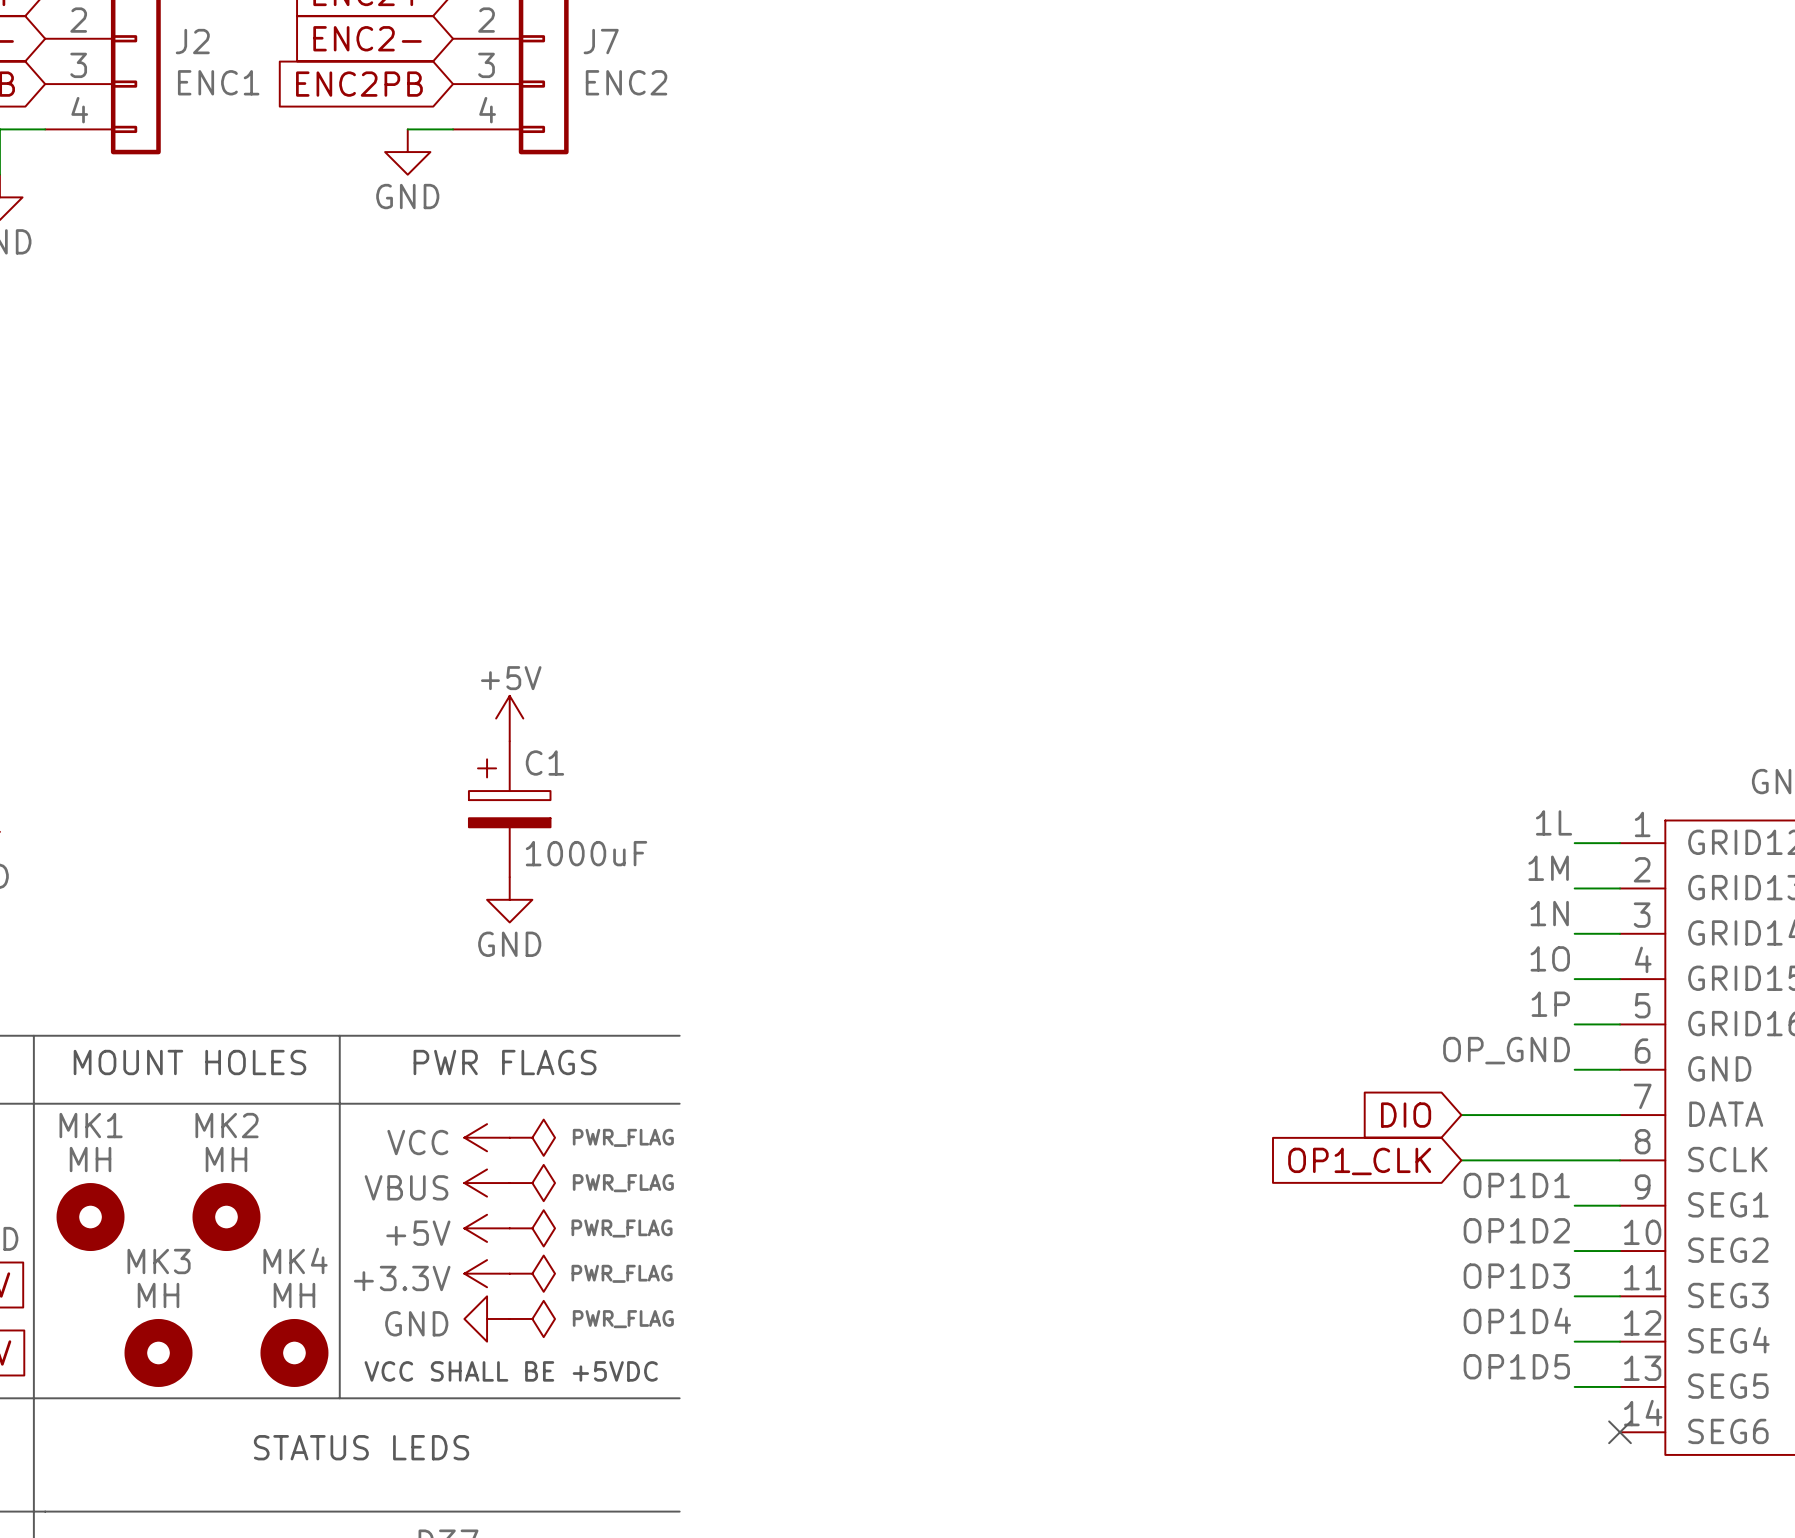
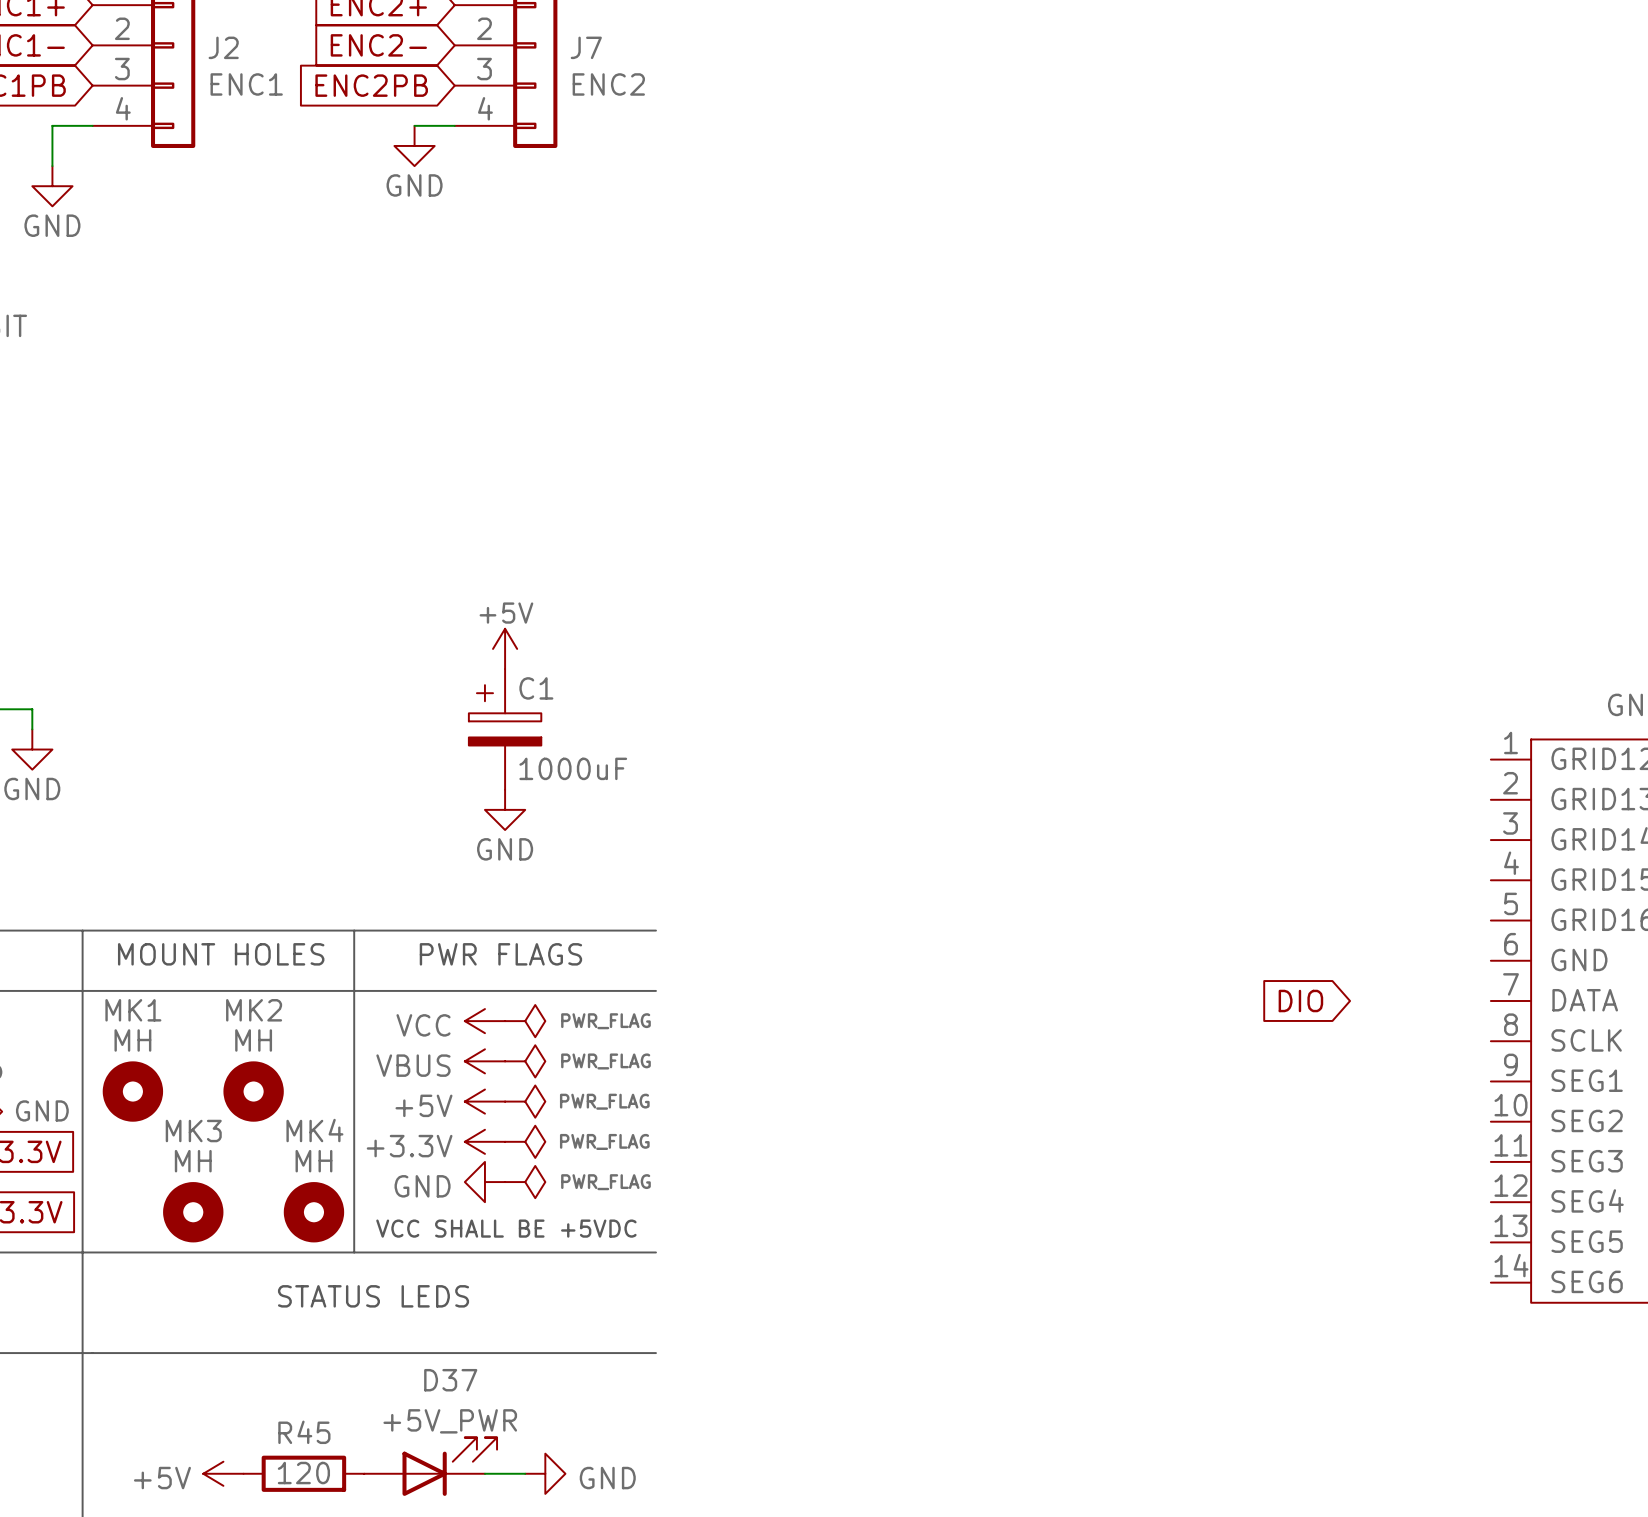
label: 1L (1554, 822) -> none
wire: (1574, 843) (1620, 843) -> none
label: 1M (1548, 868) -> none
wire: (1574, 888) (1620, 888) -> none
label: 1N (1549, 913) -> none
wire: (1574, 933) (1620, 933) -> none
label: 1O (1550, 958) -> none
wire: (1574, 979) (1620, 979) -> none
label: 1P (1550, 1004) -> none
wire: (1574, 1024) (1620, 1024) -> none
label: OP_GND (1506, 1050) -> none
wire: (1574, 1069) (1620, 1069) -> none
wire: (1461, 1115) (1620, 1115) -> none
wire: (1461, 1160) (1620, 1160) -> none
global label: OP1_CLK (1359, 1161) -> none
label: OP1D1 (1516, 1185) -> none
wire: (1574, 1205) (1620, 1205) -> none
label: OP1D2 (1516, 1230) -> none
wire: (1574, 1251) (1620, 1251) -> none
label: OP1D3 (1516, 1276) -> none
wire: (1574, 1296) (1620, 1296) -> none
label: OP1D4 (1517, 1320) -> none
wire: (1574, 1341) (1620, 1341) -> none
label: OP1D5 (1516, 1366) -> none
wire: (1574, 1386) (1620, 1386) -> none
no-connect mark: (1620, 1432) -> none

